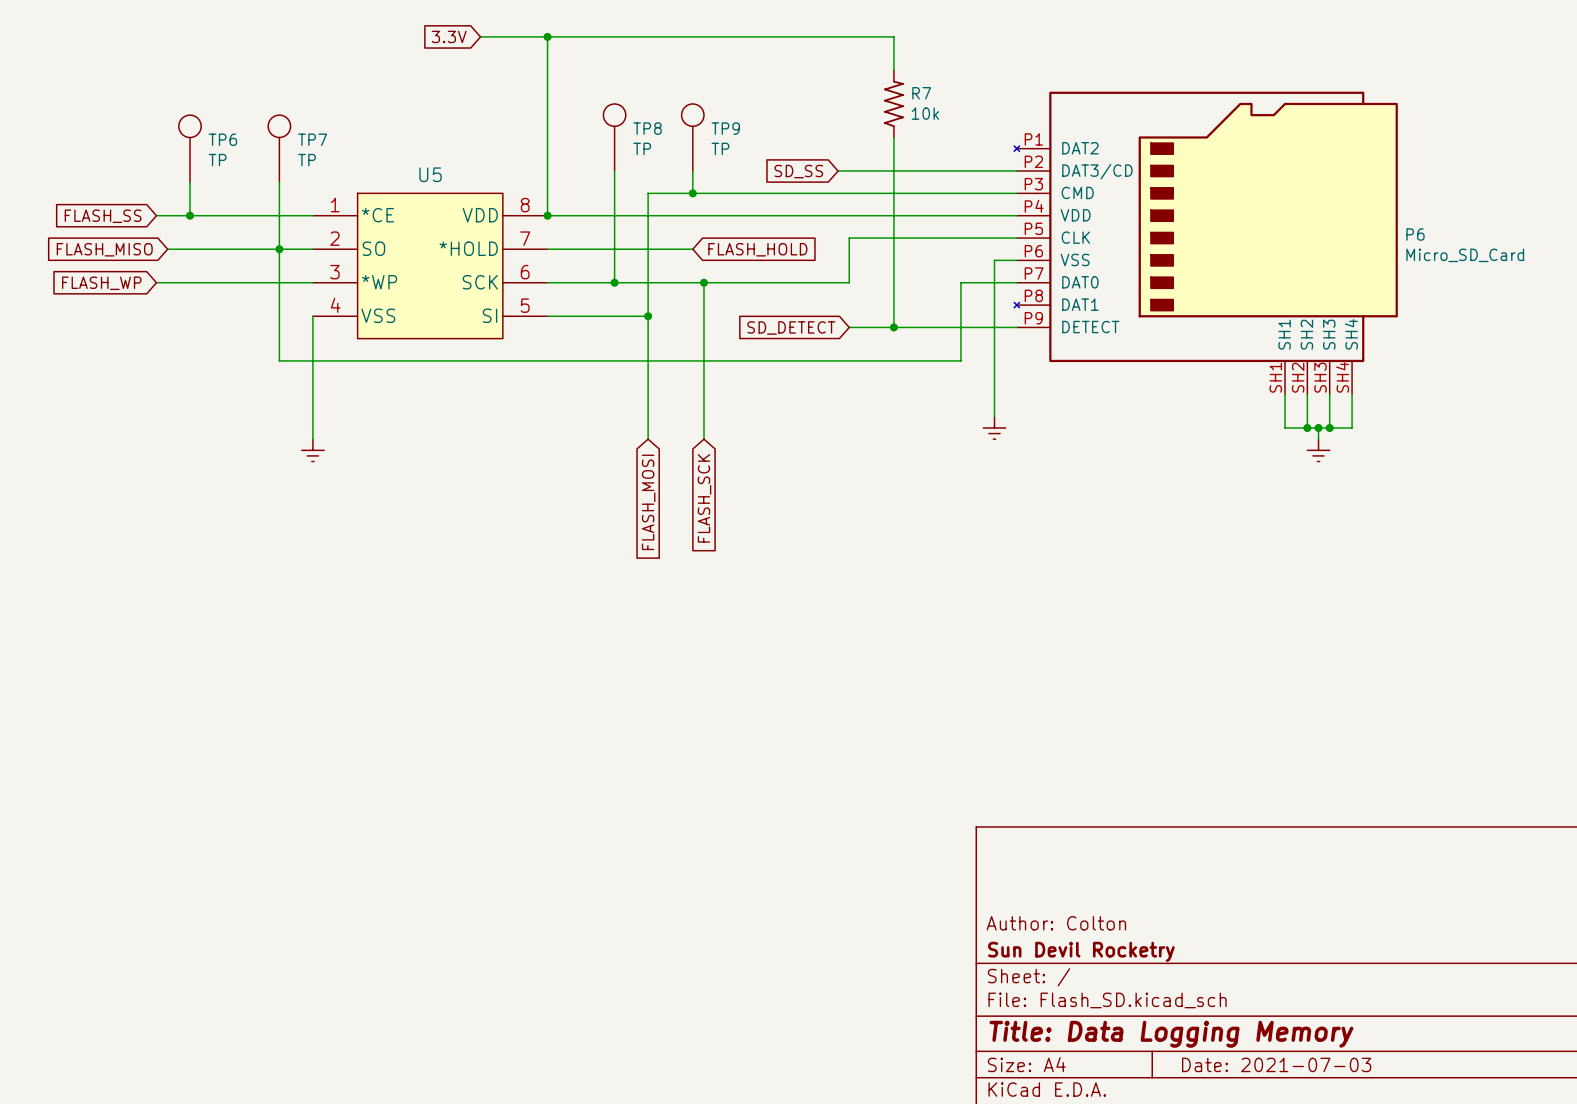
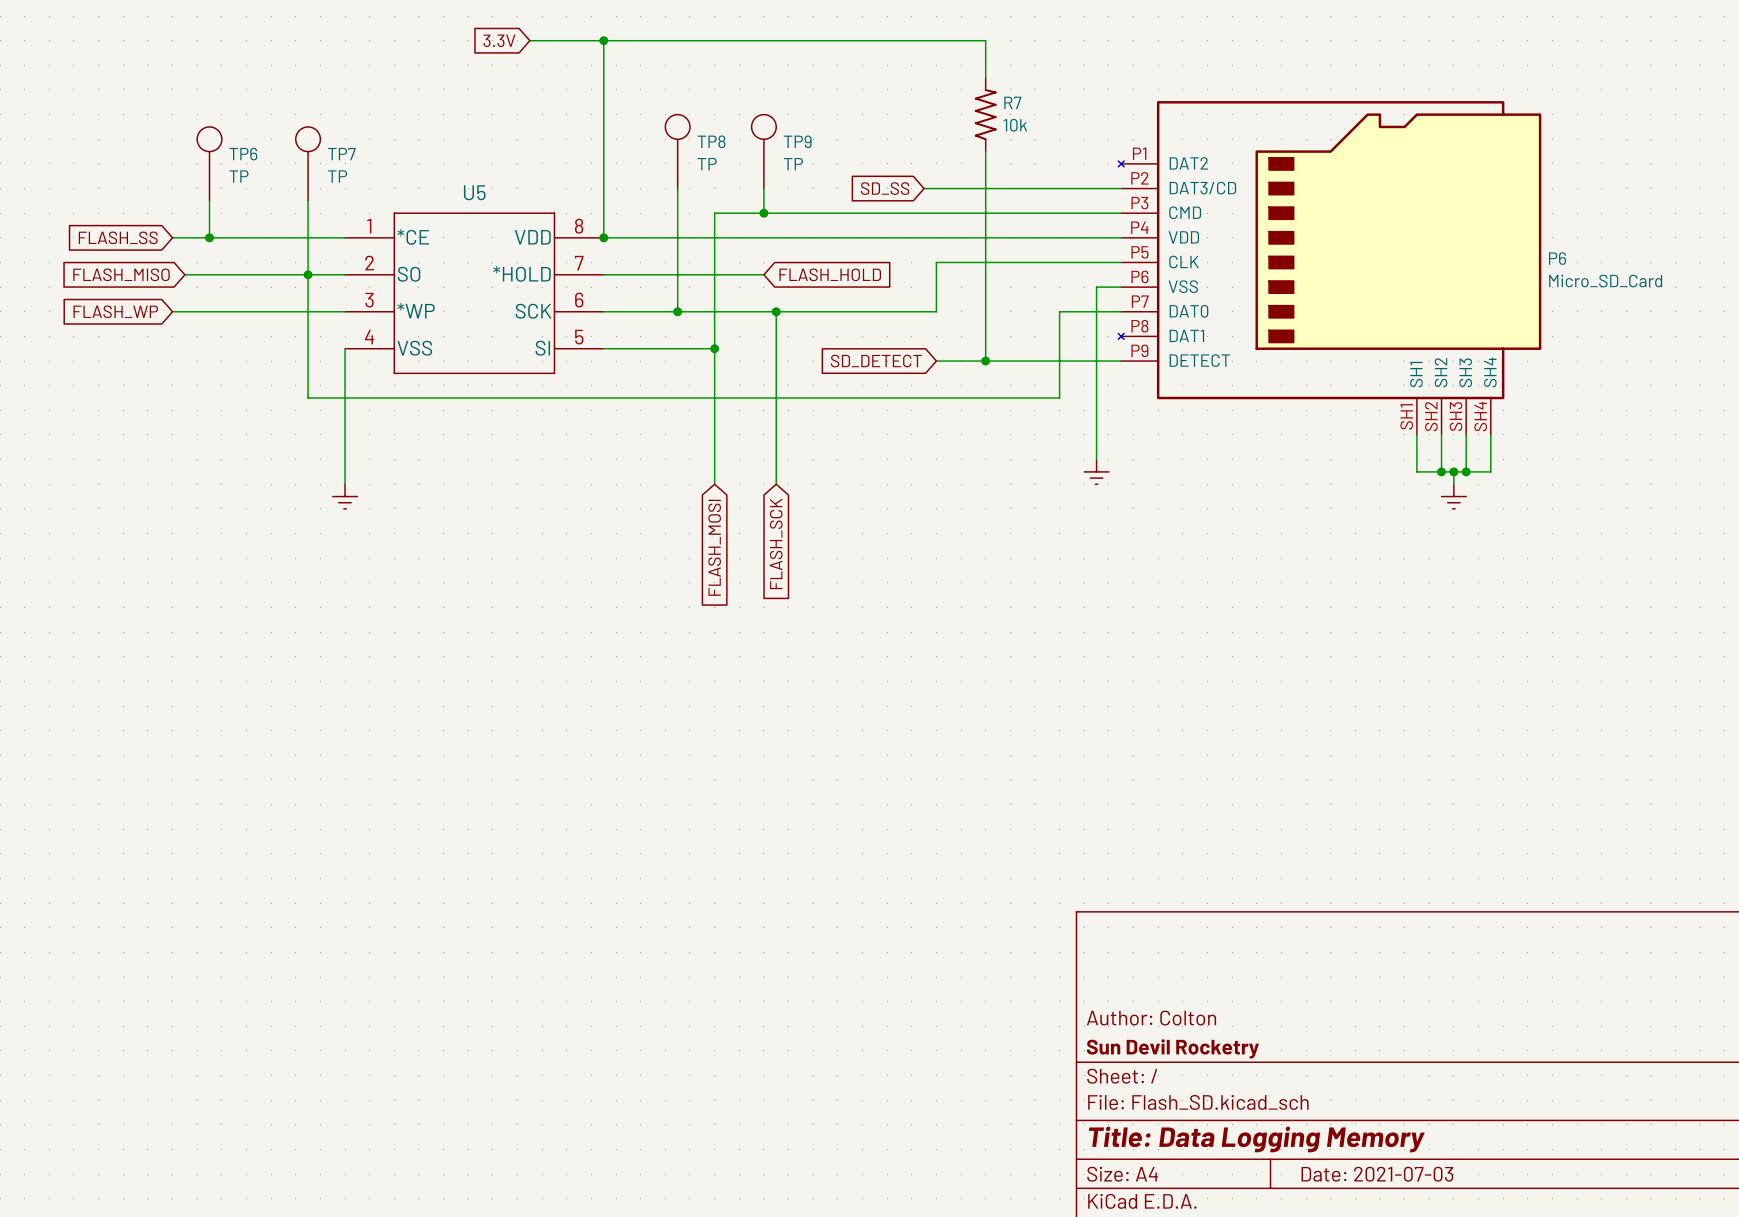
U5 symbol: [312, 192, 548, 340] -> [345, 212, 604, 374]

